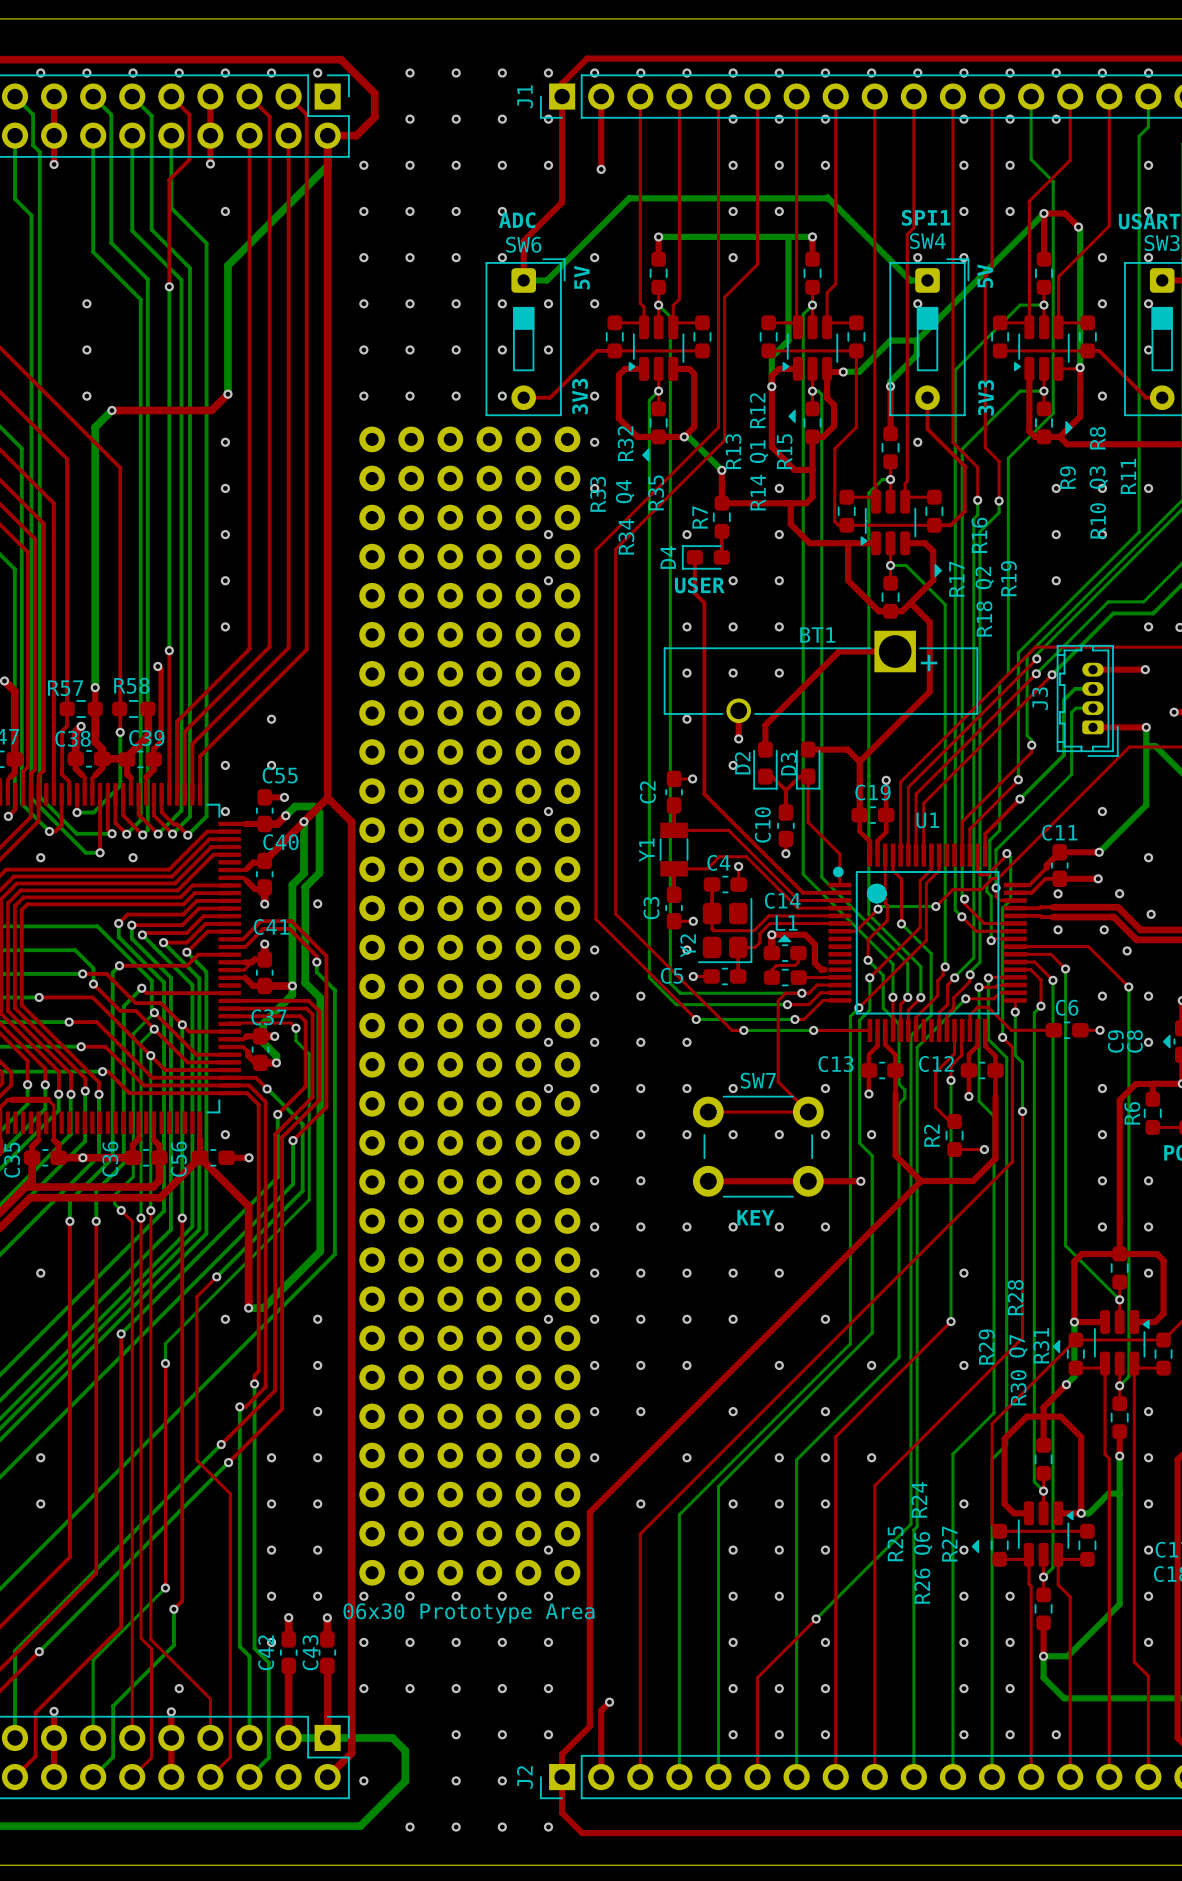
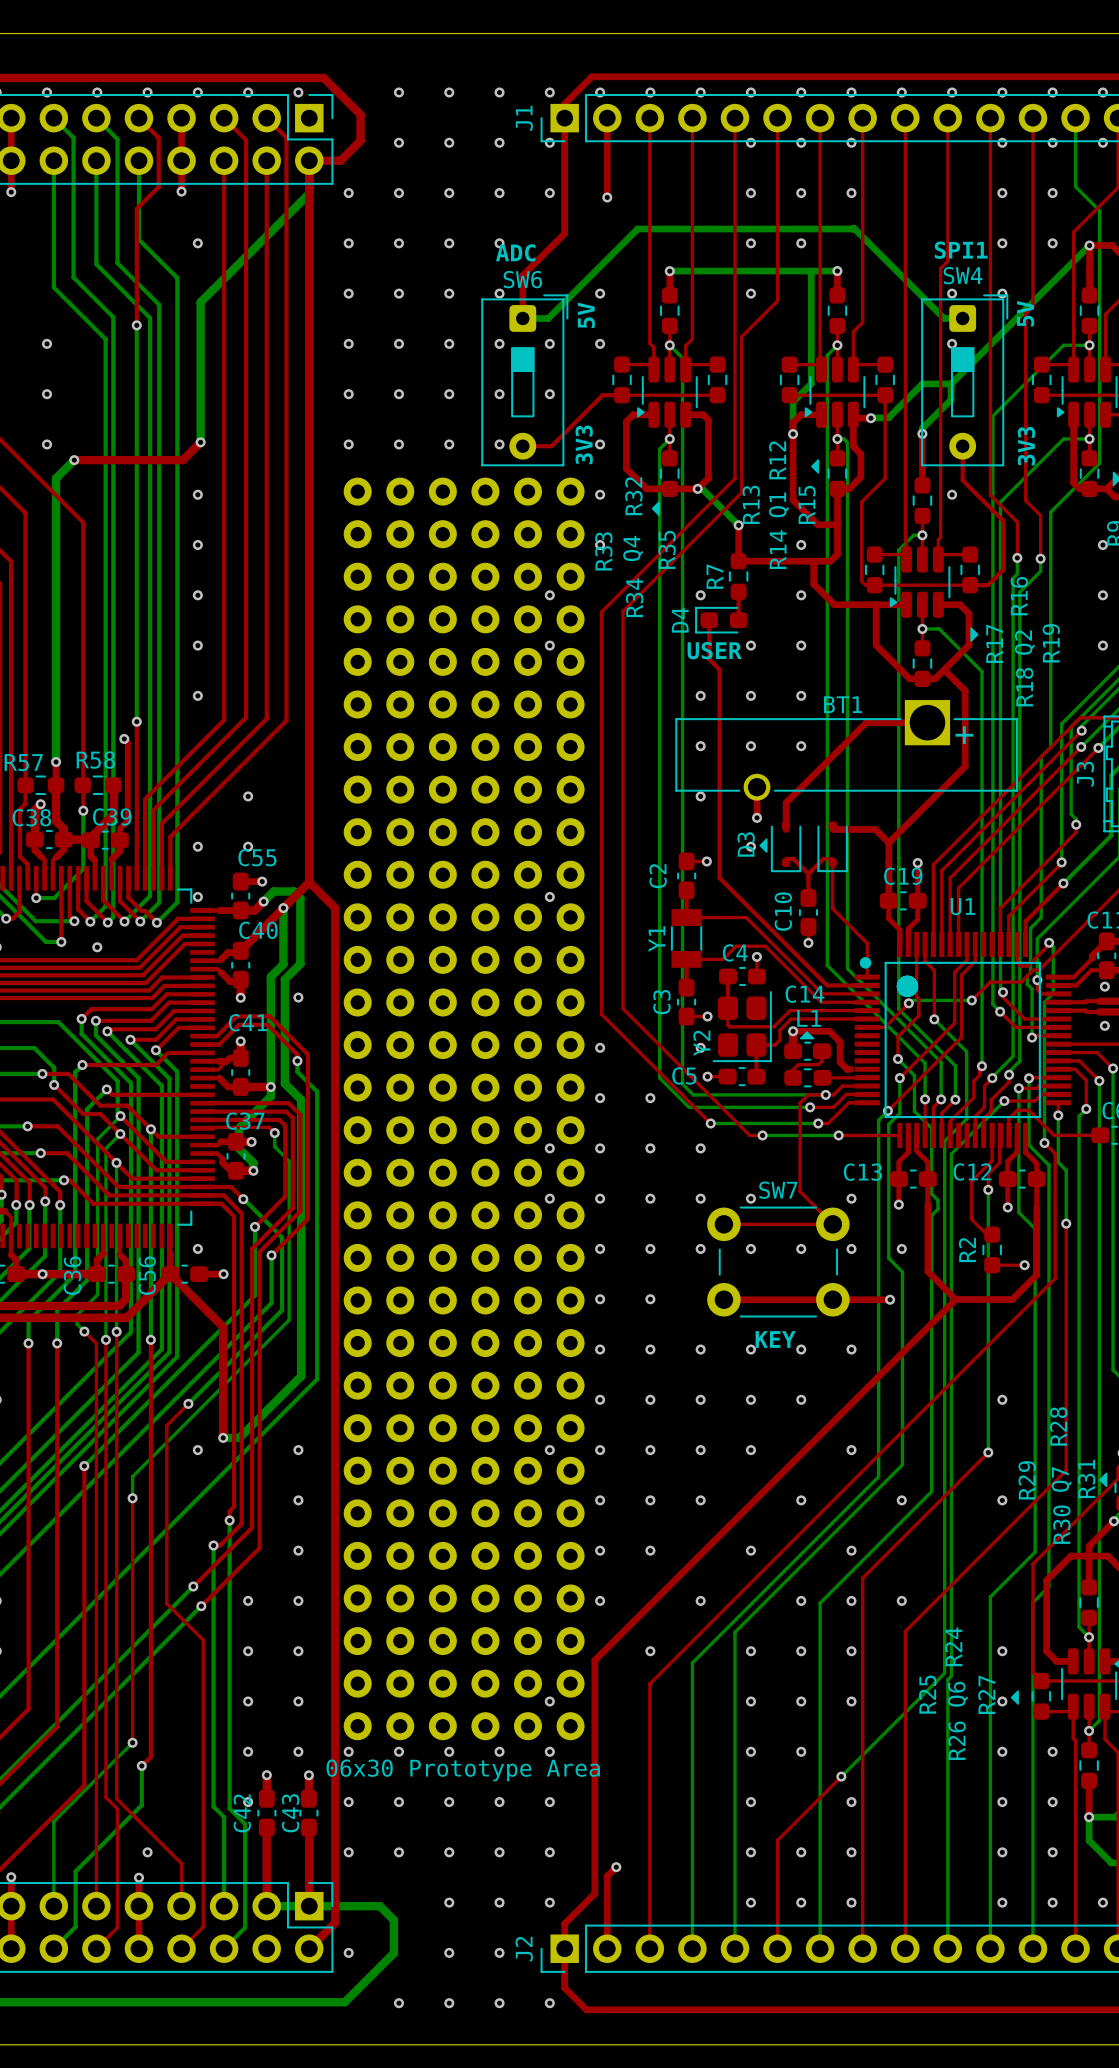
D3 footprint: [795, 741, 821, 790] -> [817, 821, 848, 873]
drawing: none -> [759, 838, 768, 853]
D3 name position: D3 (788, 764) -> D3 (746, 844)
D2: (765, 765) -> none
part: none -> (786, 846)

